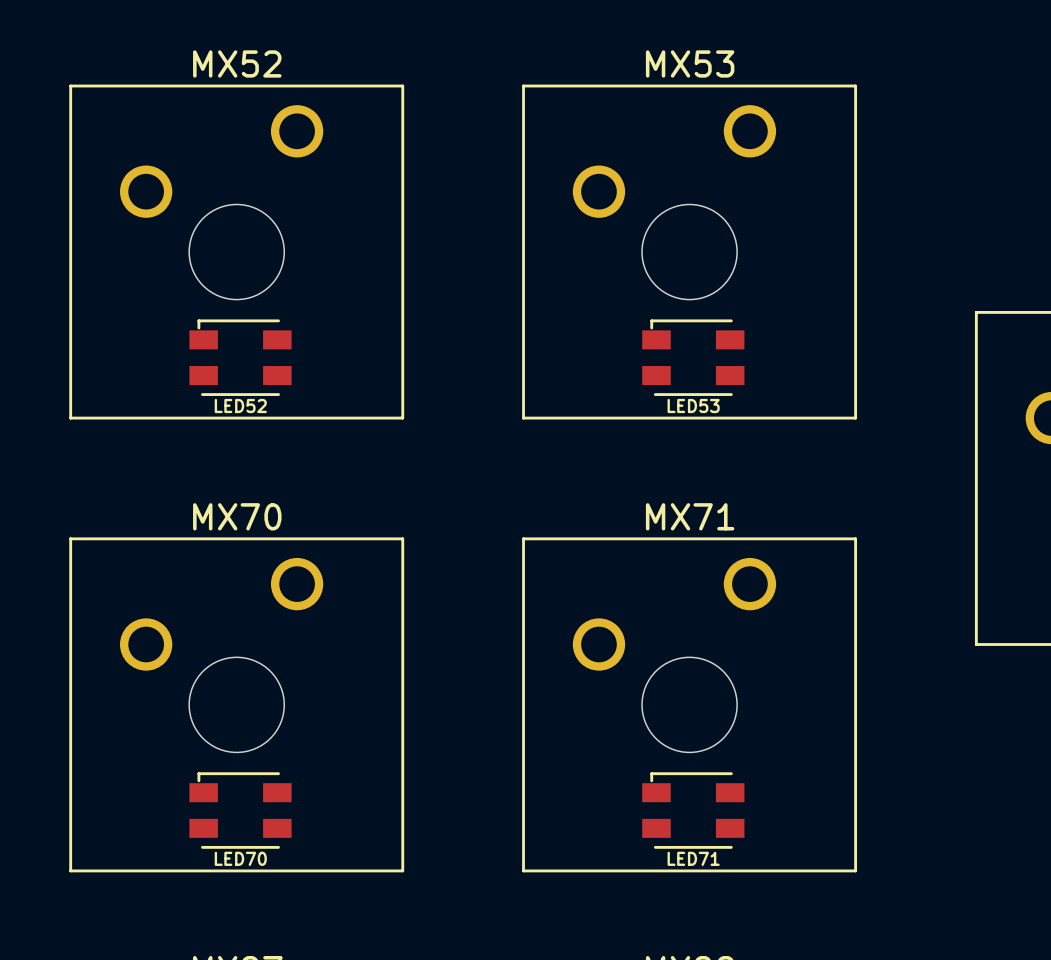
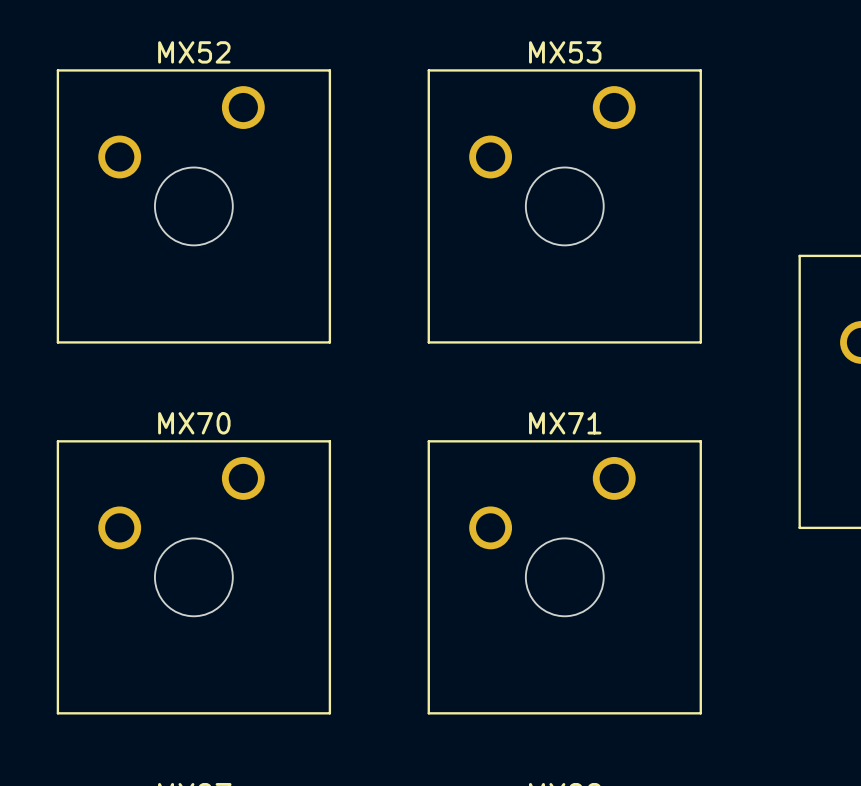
LED52: (240, 357) -> none
LED53: (693, 357) -> none
LED70: (240, 810) -> none
LED71: (693, 810) -> none

